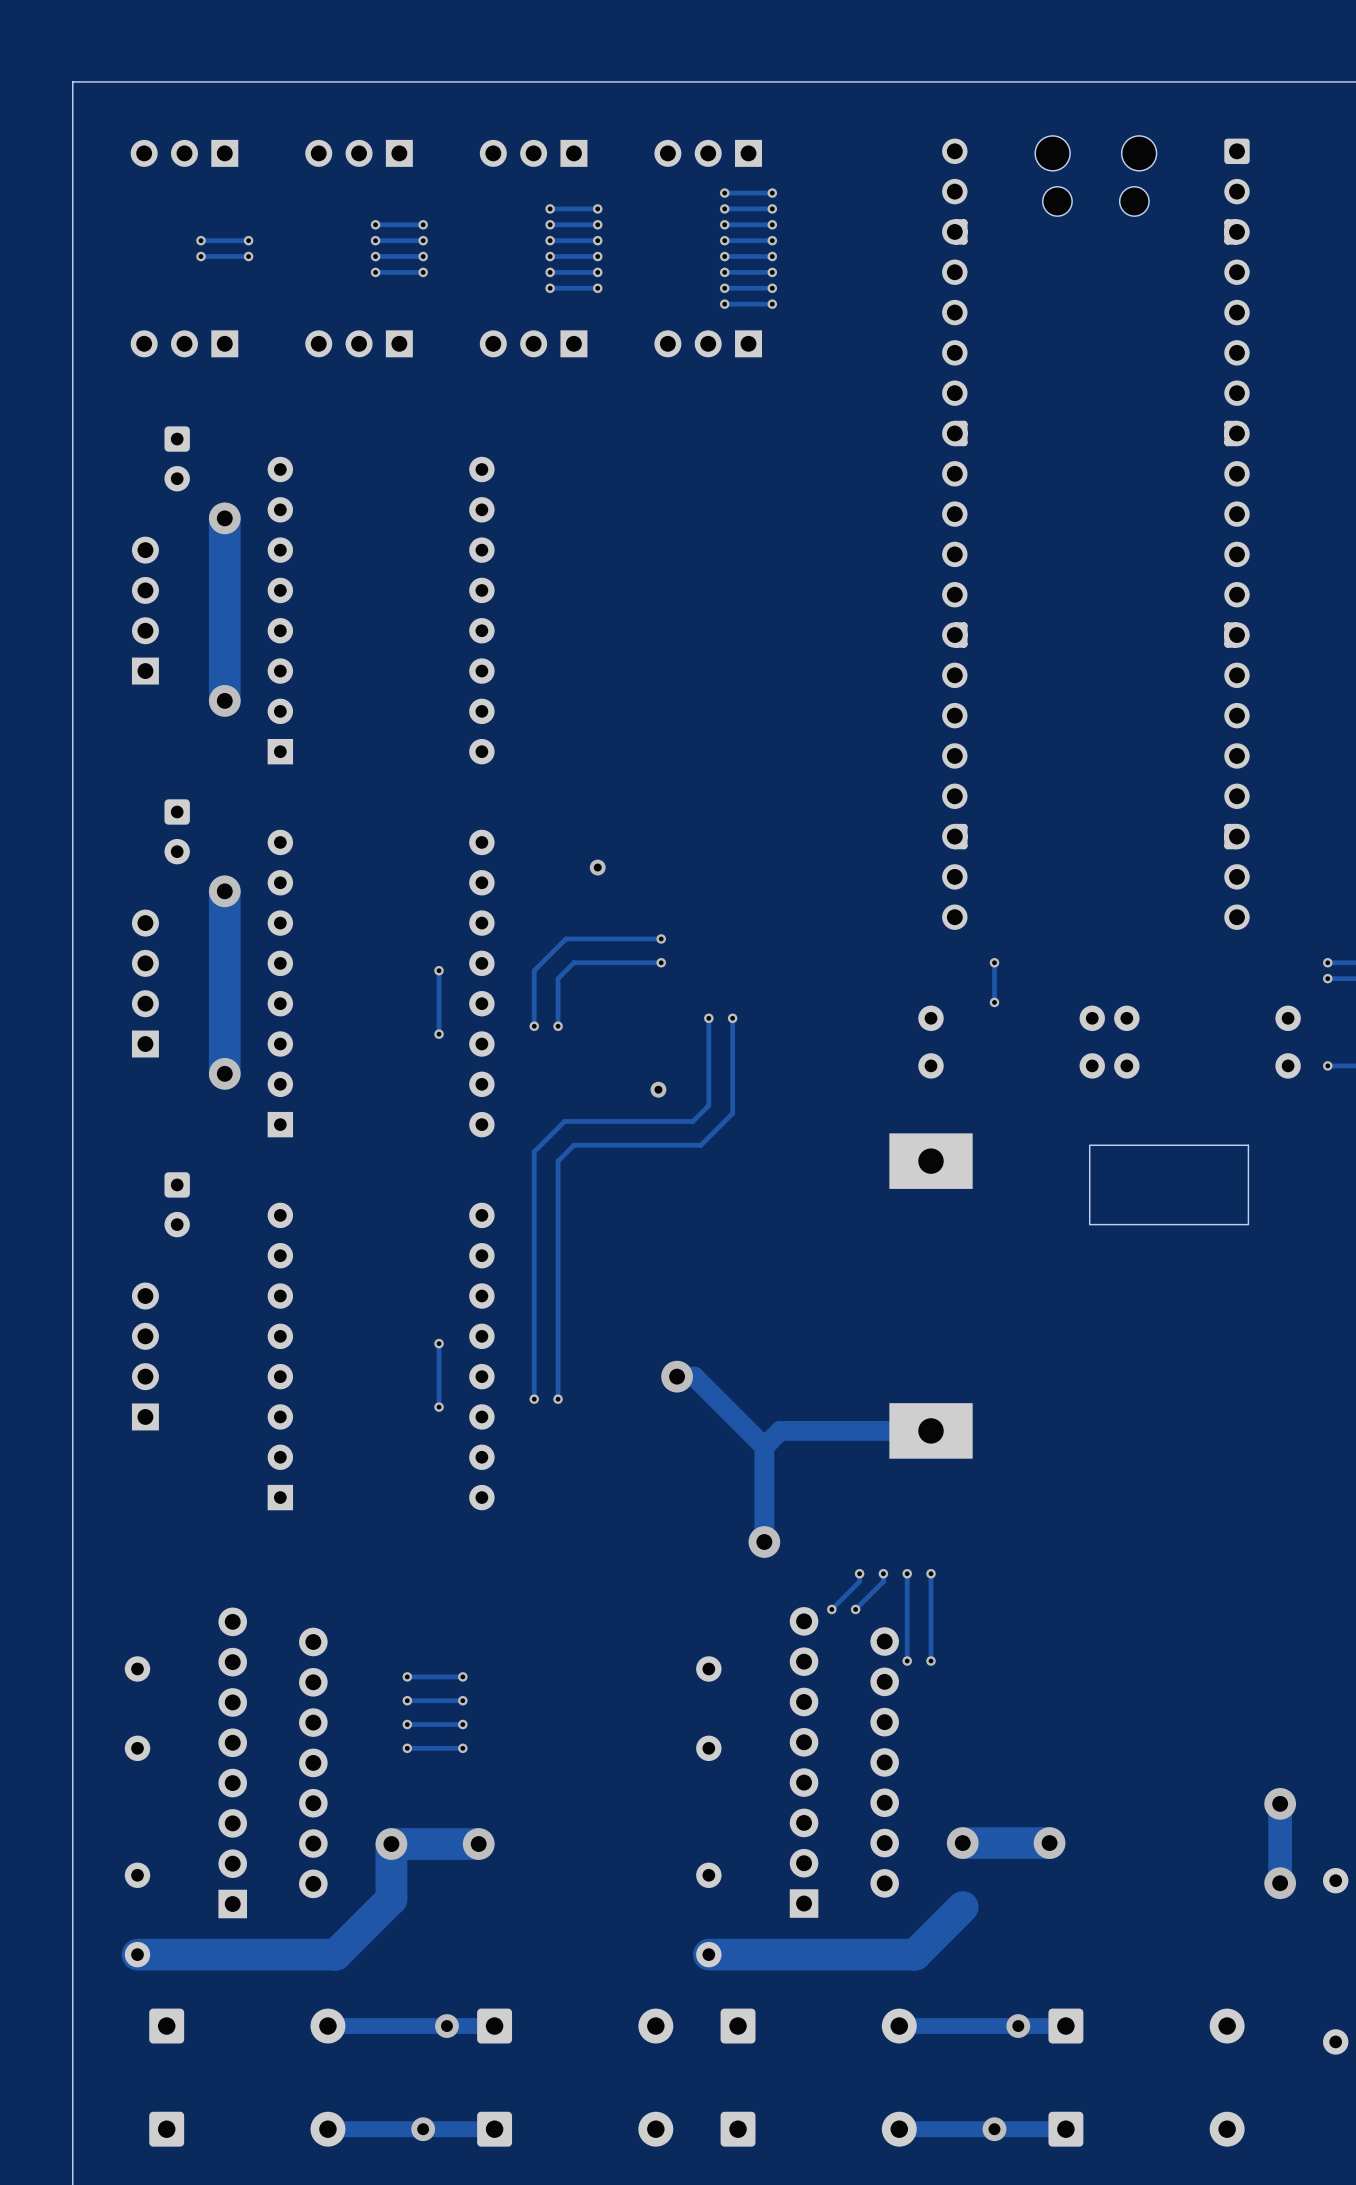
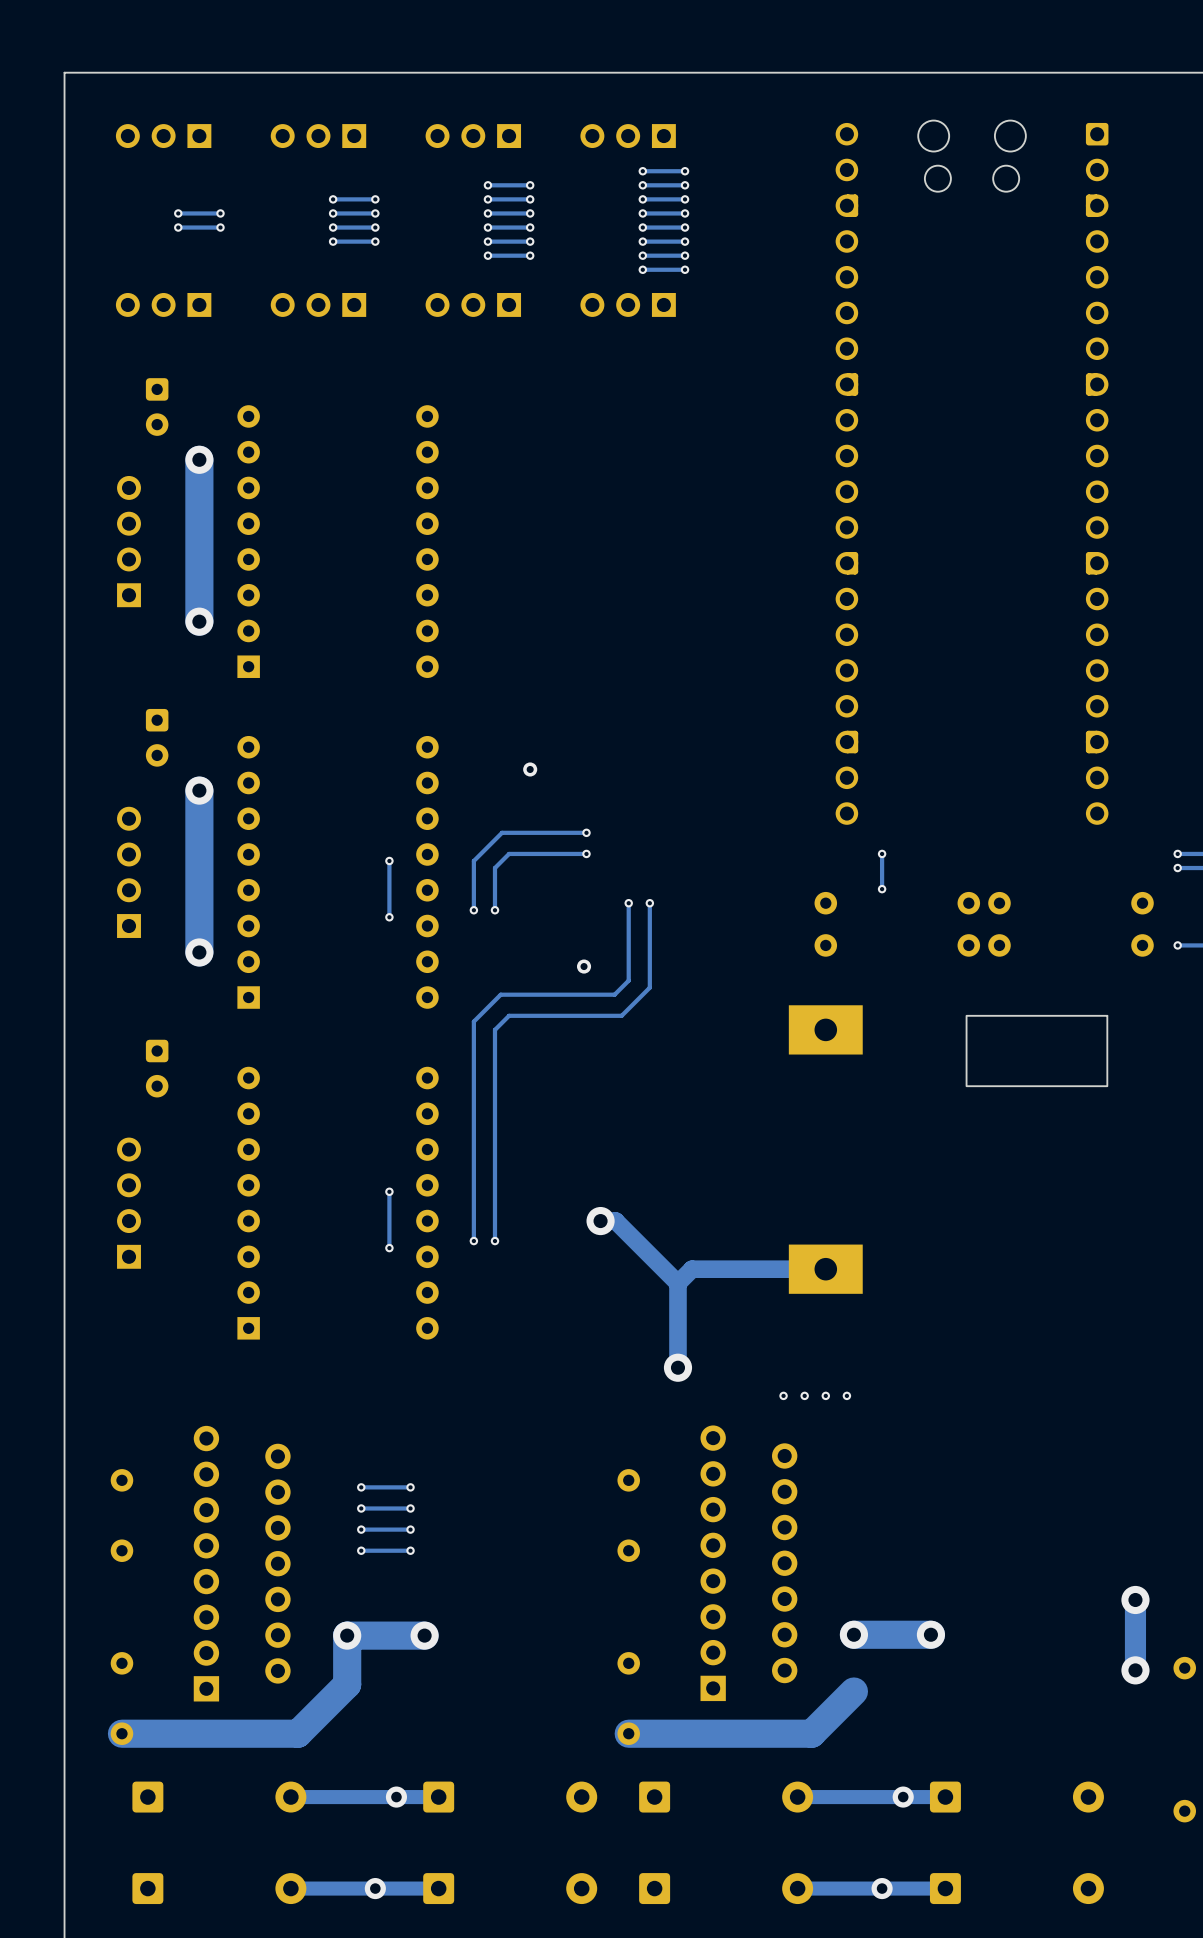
track: (859, 1573) (859, 1581) (831, 1609) -> none
via: (859, 1573) -> none
track: (883, 1573) (883, 1581) (855, 1609) -> none
track: (907, 1573) (907, 1661) -> none
track: (931, 1573) (931, 1661) -> none
via: none -> (846, 1395)
via: (831, 1609) -> none
via: (855, 1609) -> none
via: (907, 1661) -> none
via: (931, 1661) -> none

